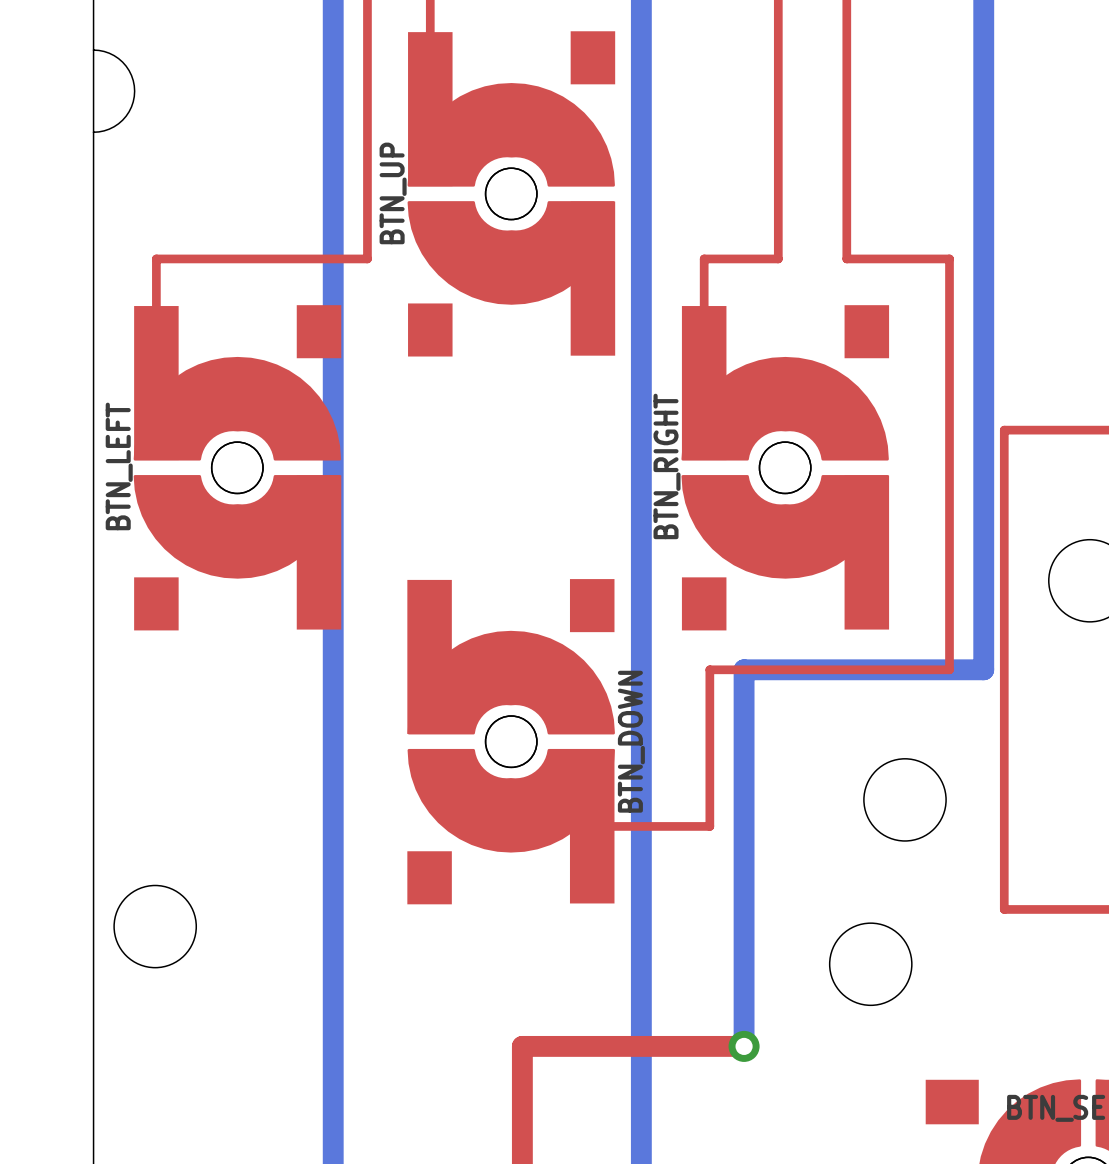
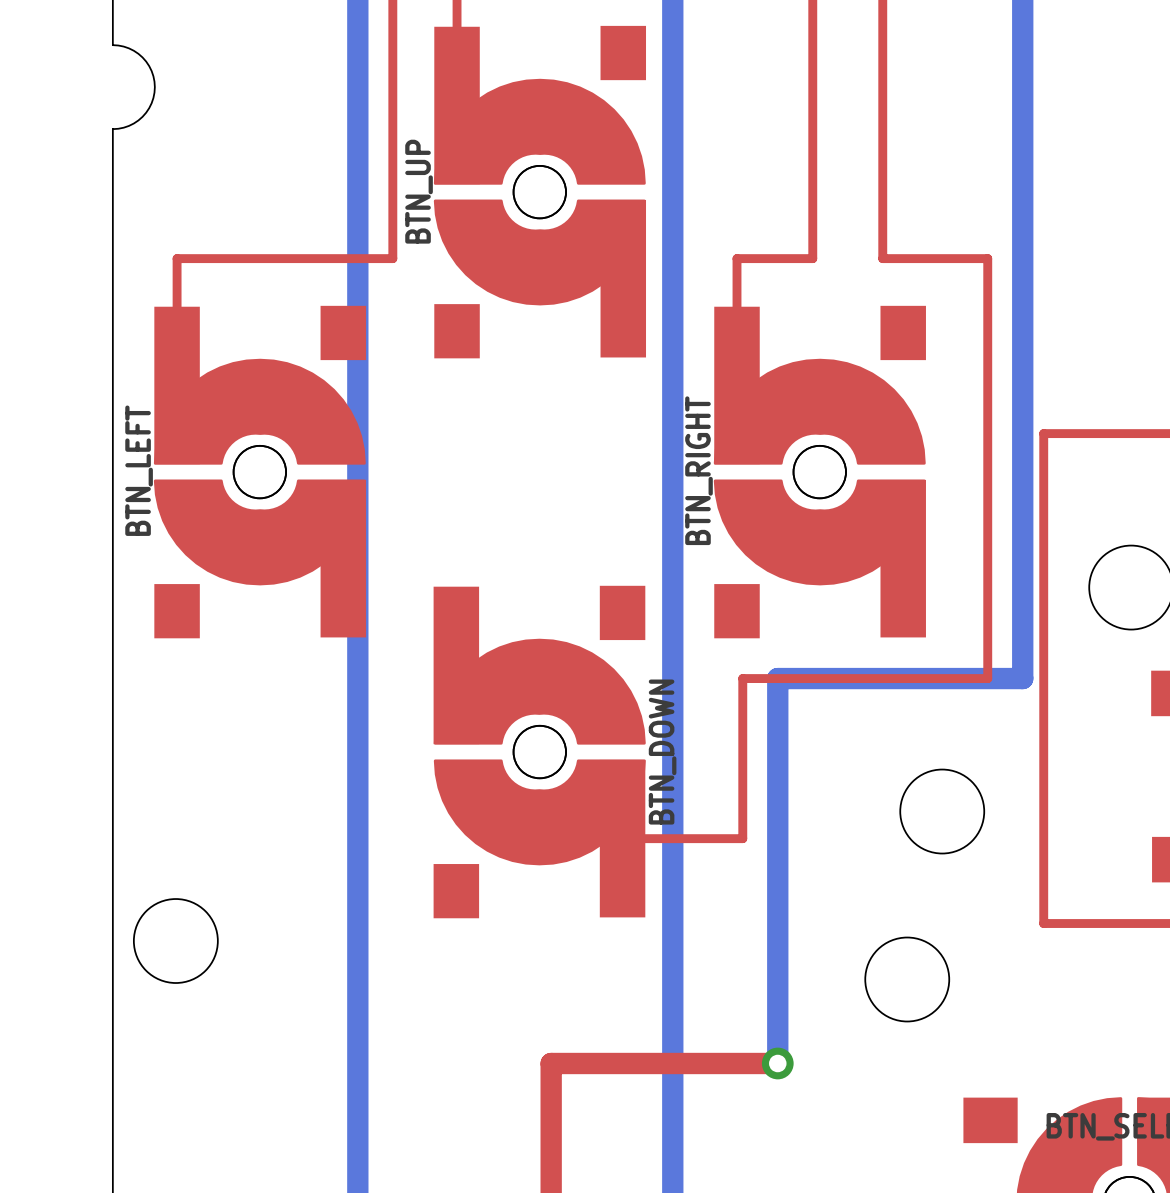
board edge: (93, 50) (93, 132) -> none

